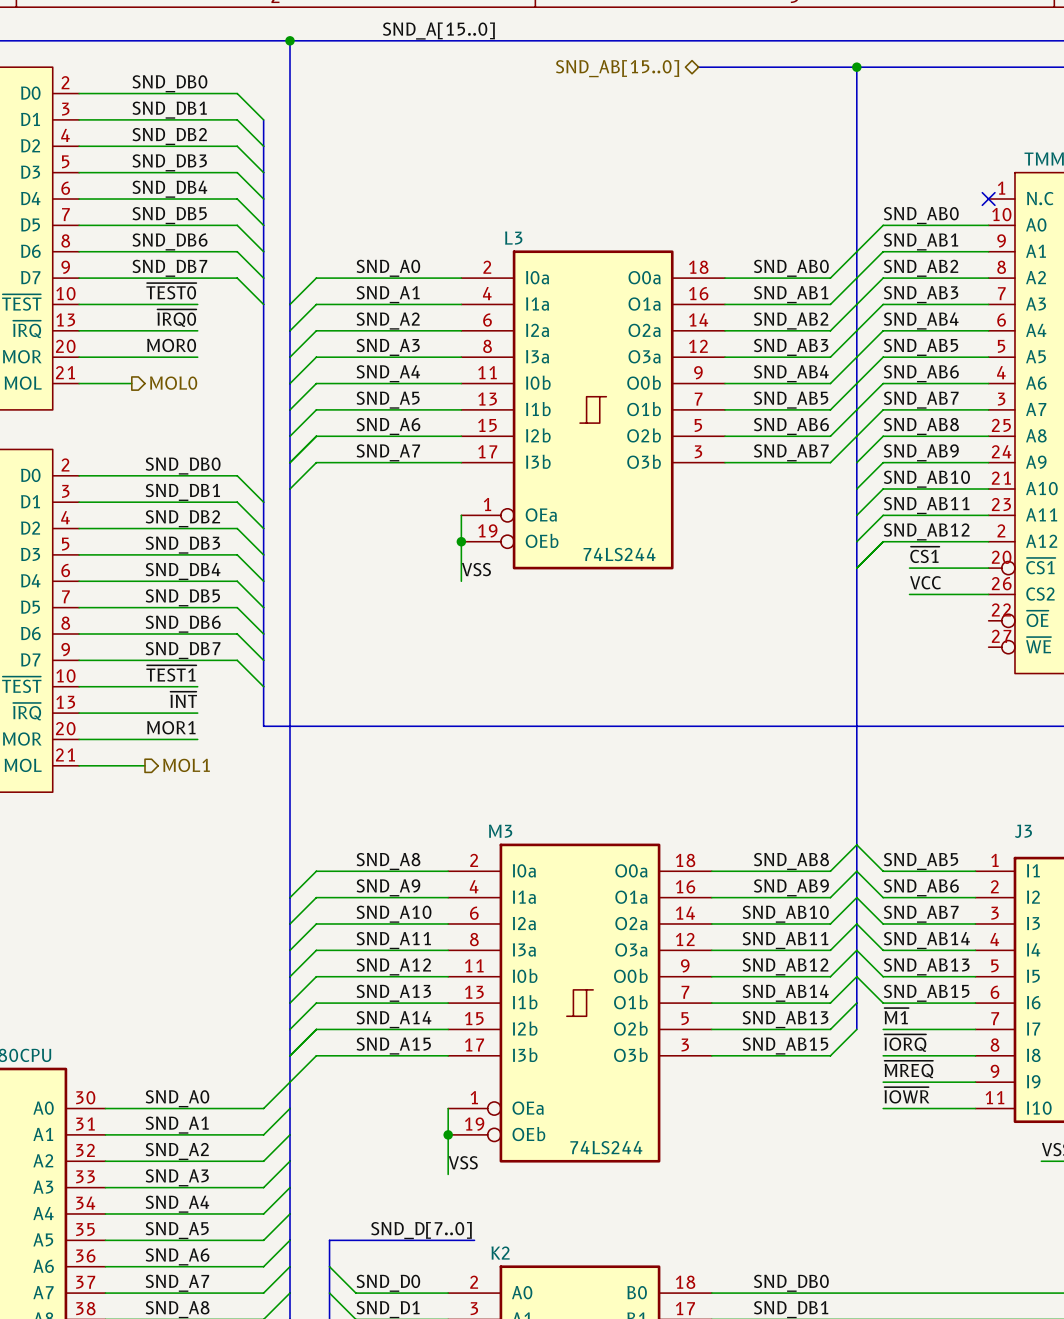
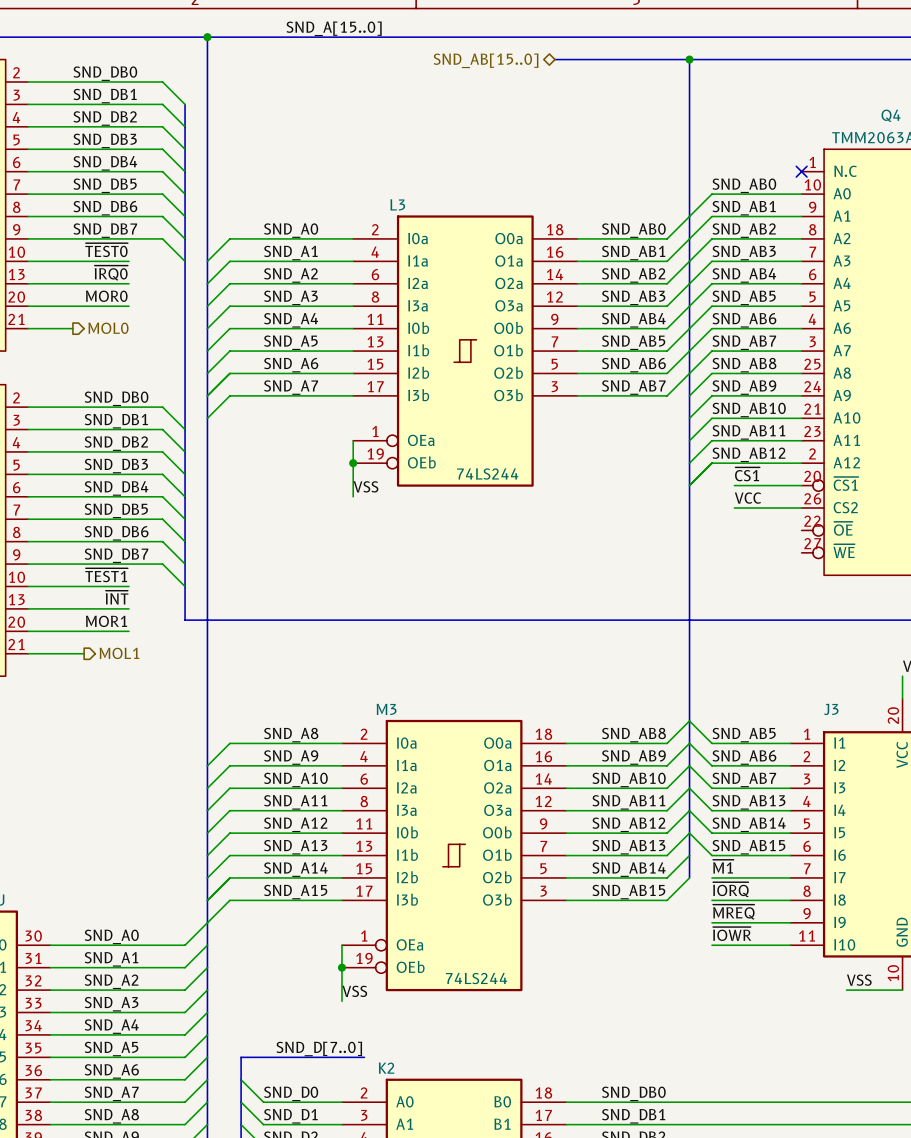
label: SND_AB14 (926, 940) -> SND_AB13 (748, 802)
label: SND_AB13 (926, 966) -> SND_AB14 (749, 824)
label: SND_AB14 (785, 993) -> SND_AB13 (628, 847)
label: SND_AB13 (785, 1019) -> SND_AB14 (629, 869)

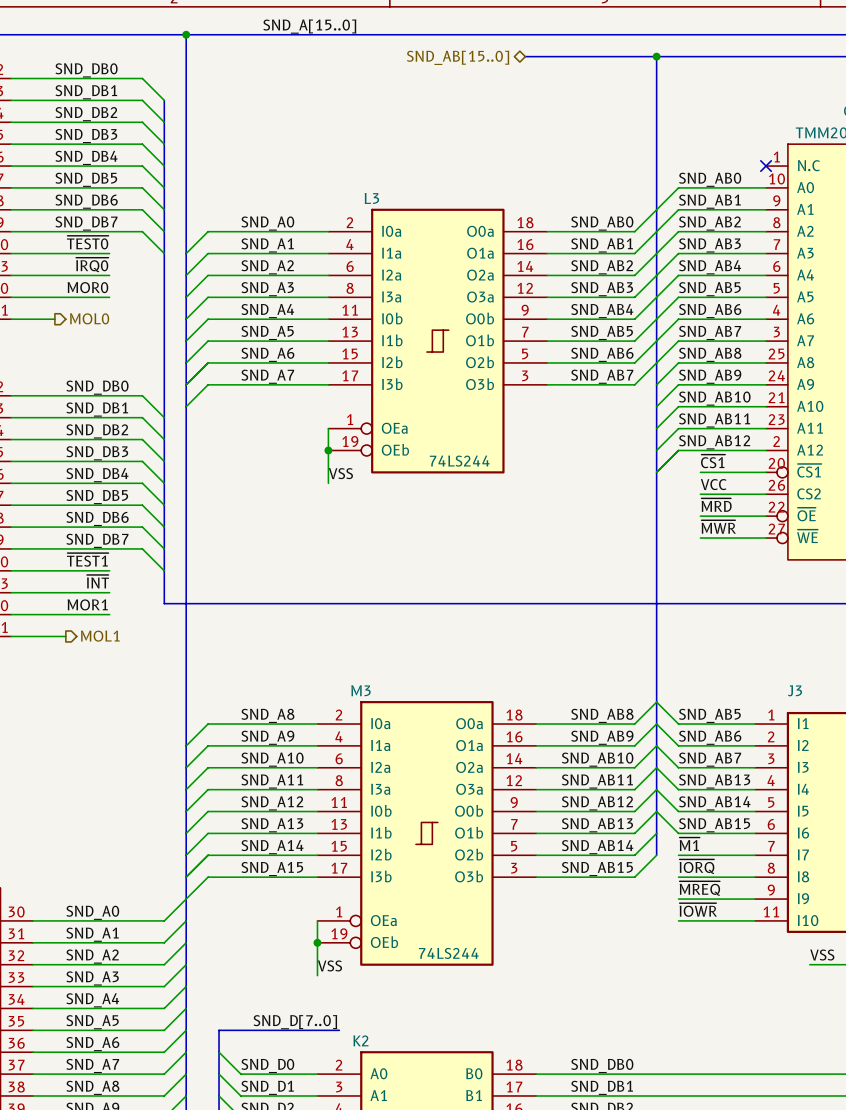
label: none -> ~{MRD} (716, 505)
wire: none -> (700, 516) (766, 516)
label: none -> ~{MWR} (718, 526)
wire: none -> (700, 538) (766, 538)

